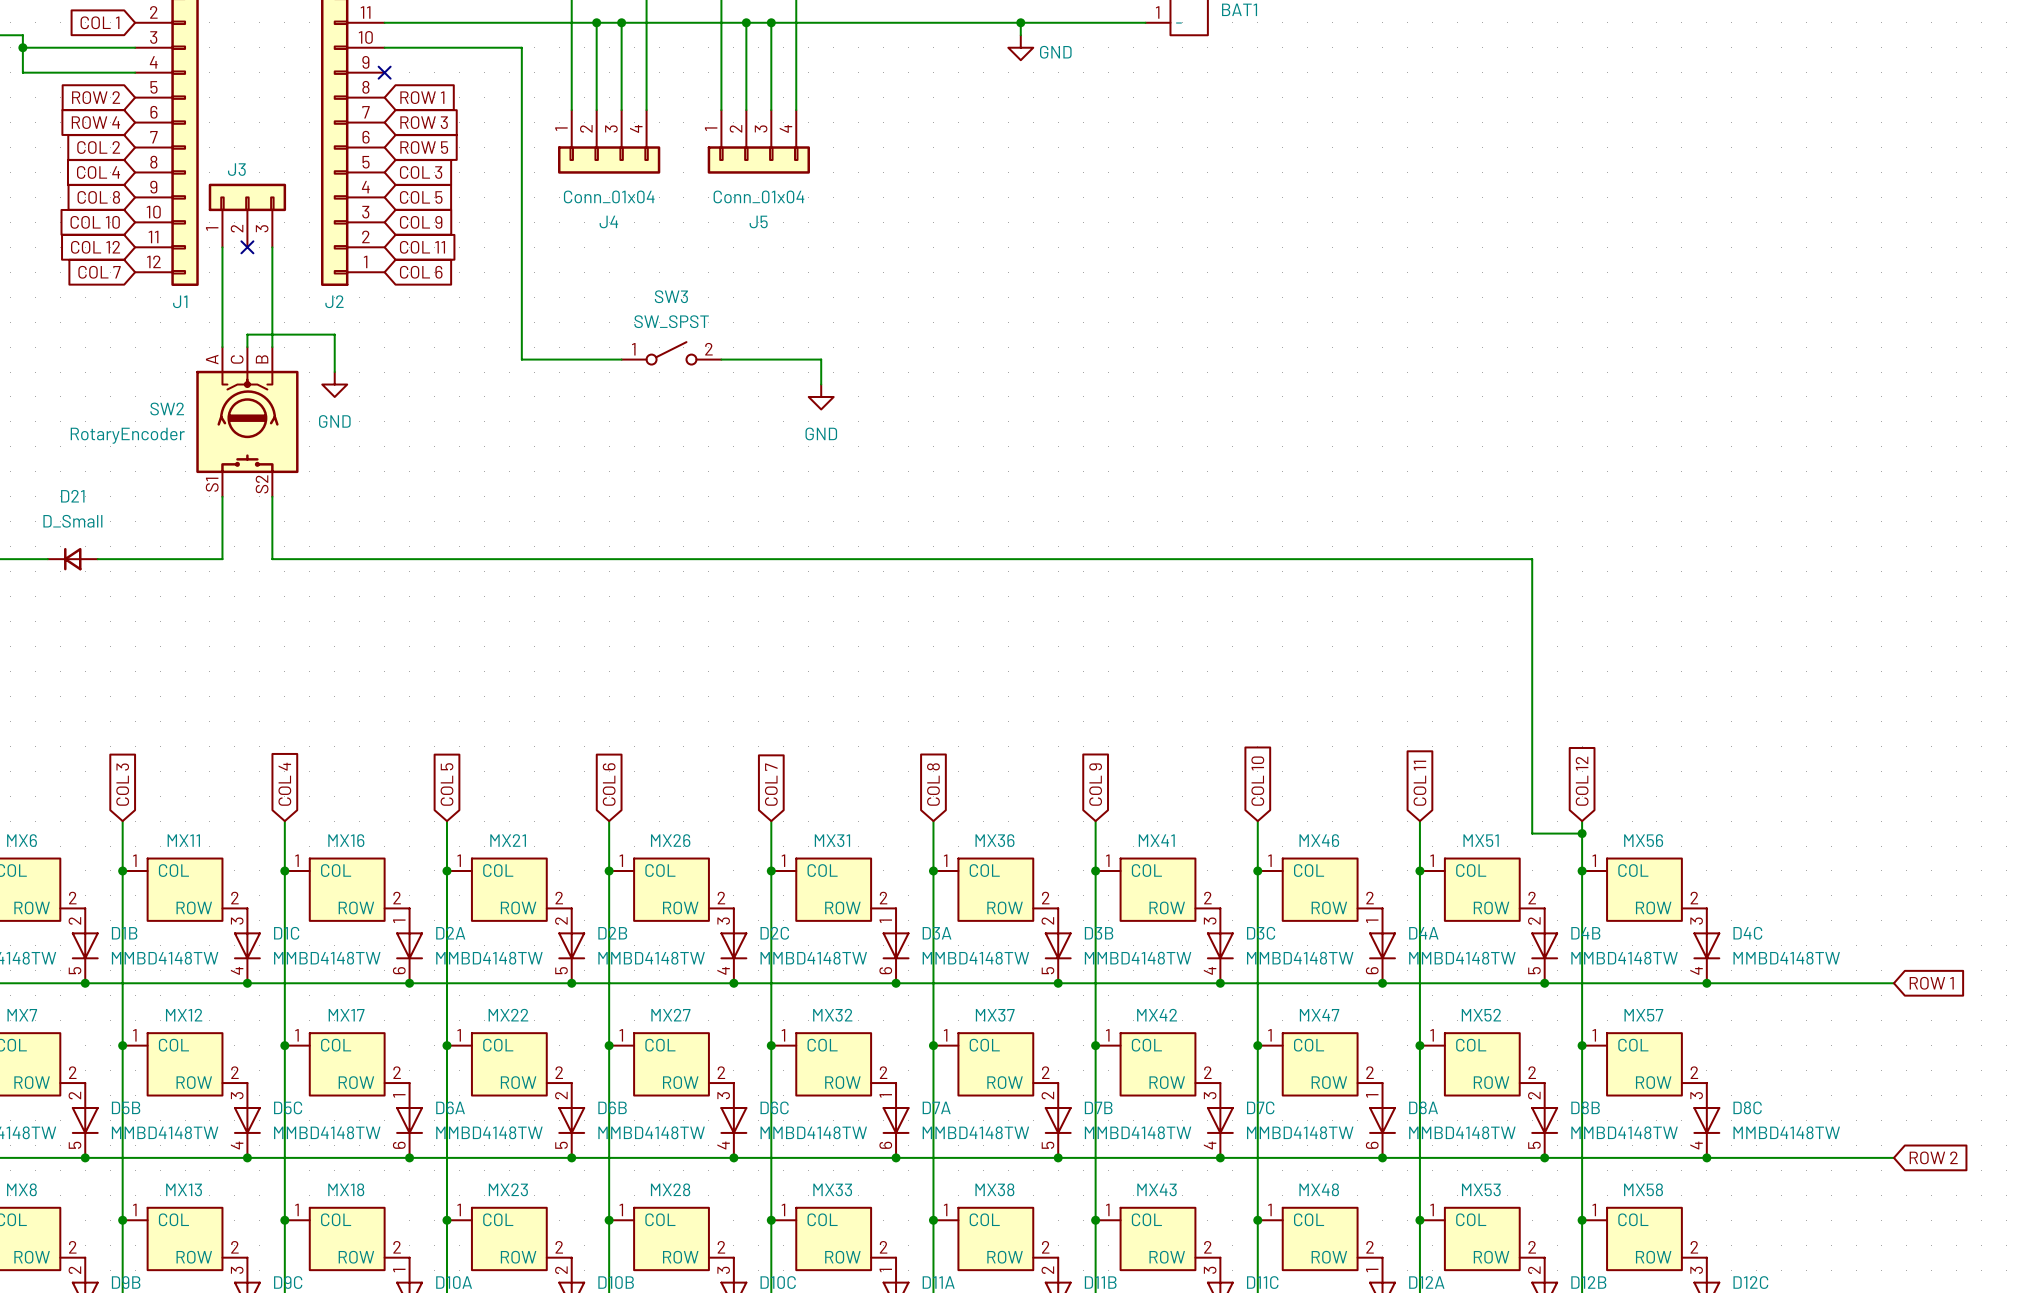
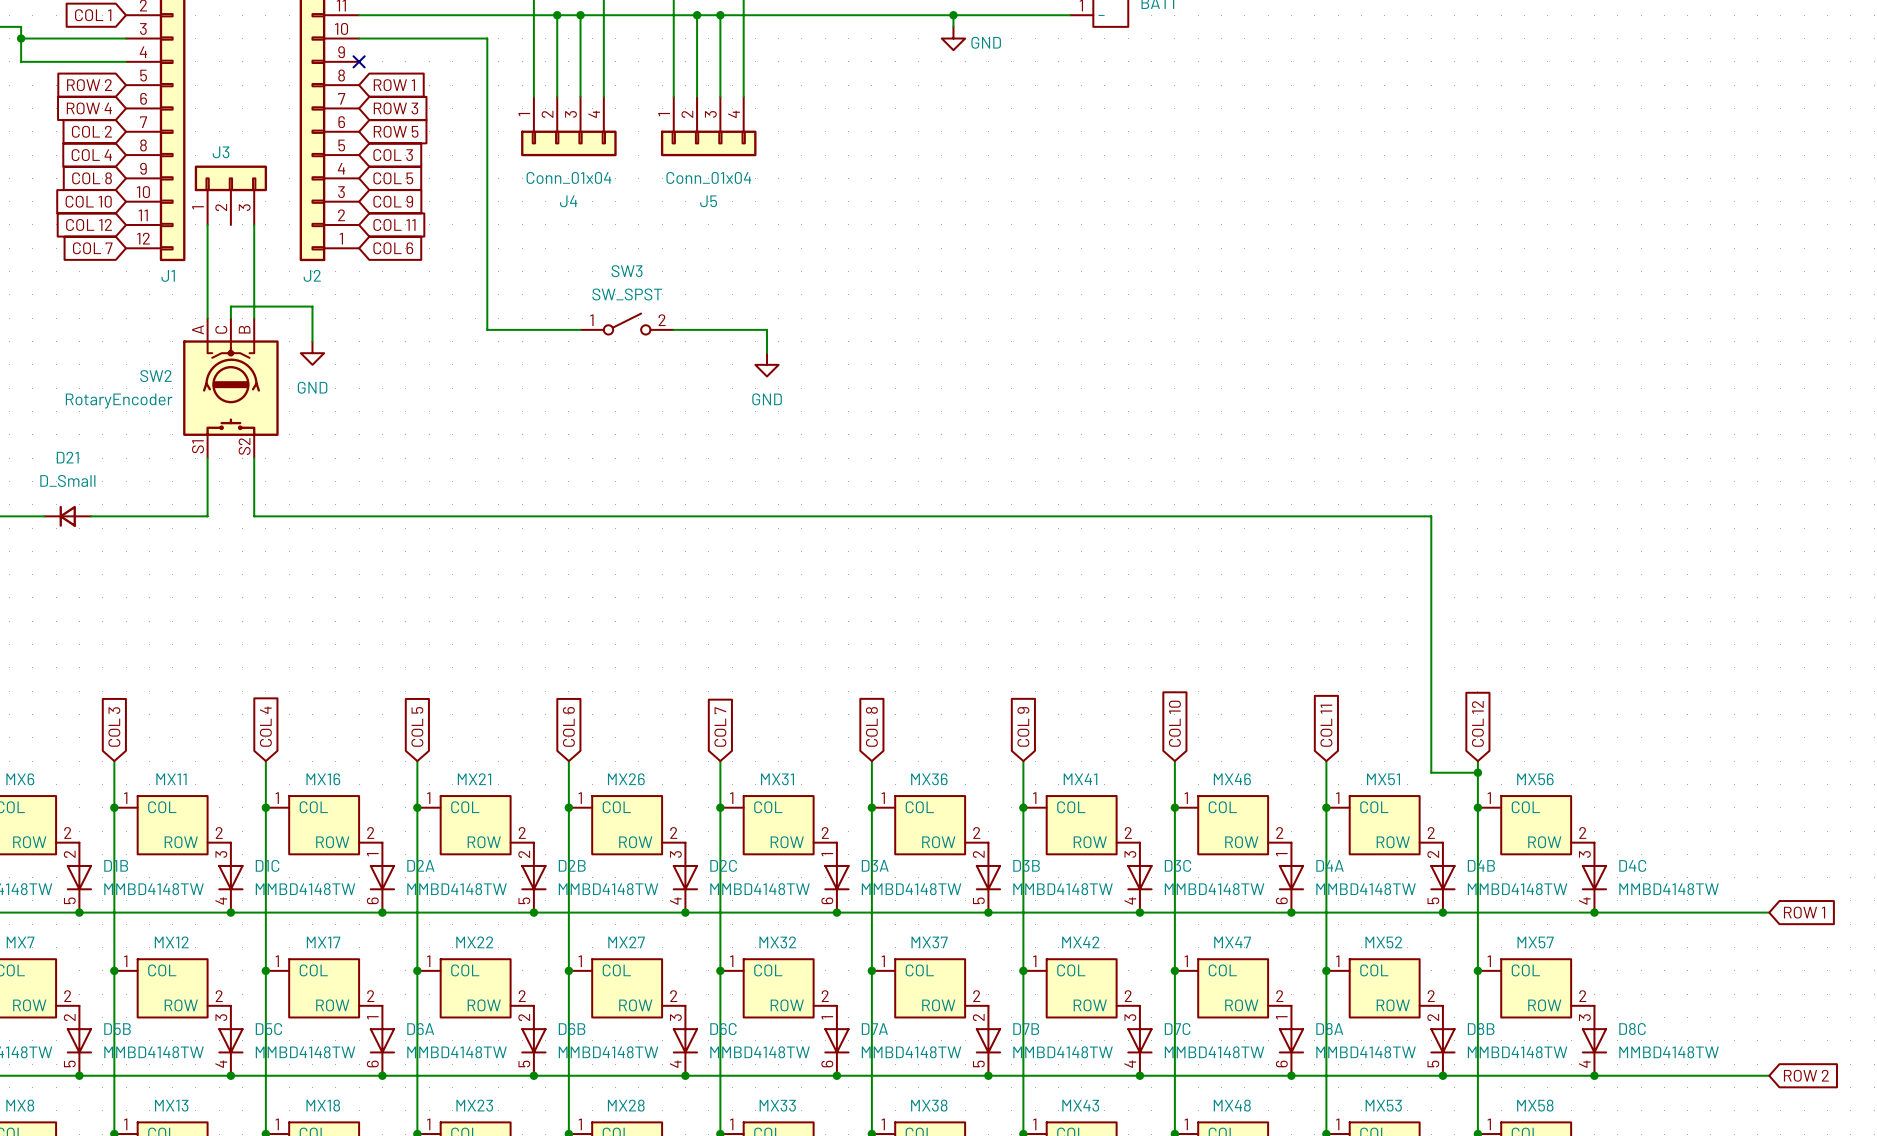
no-connect mark: (247, 247) -> none

